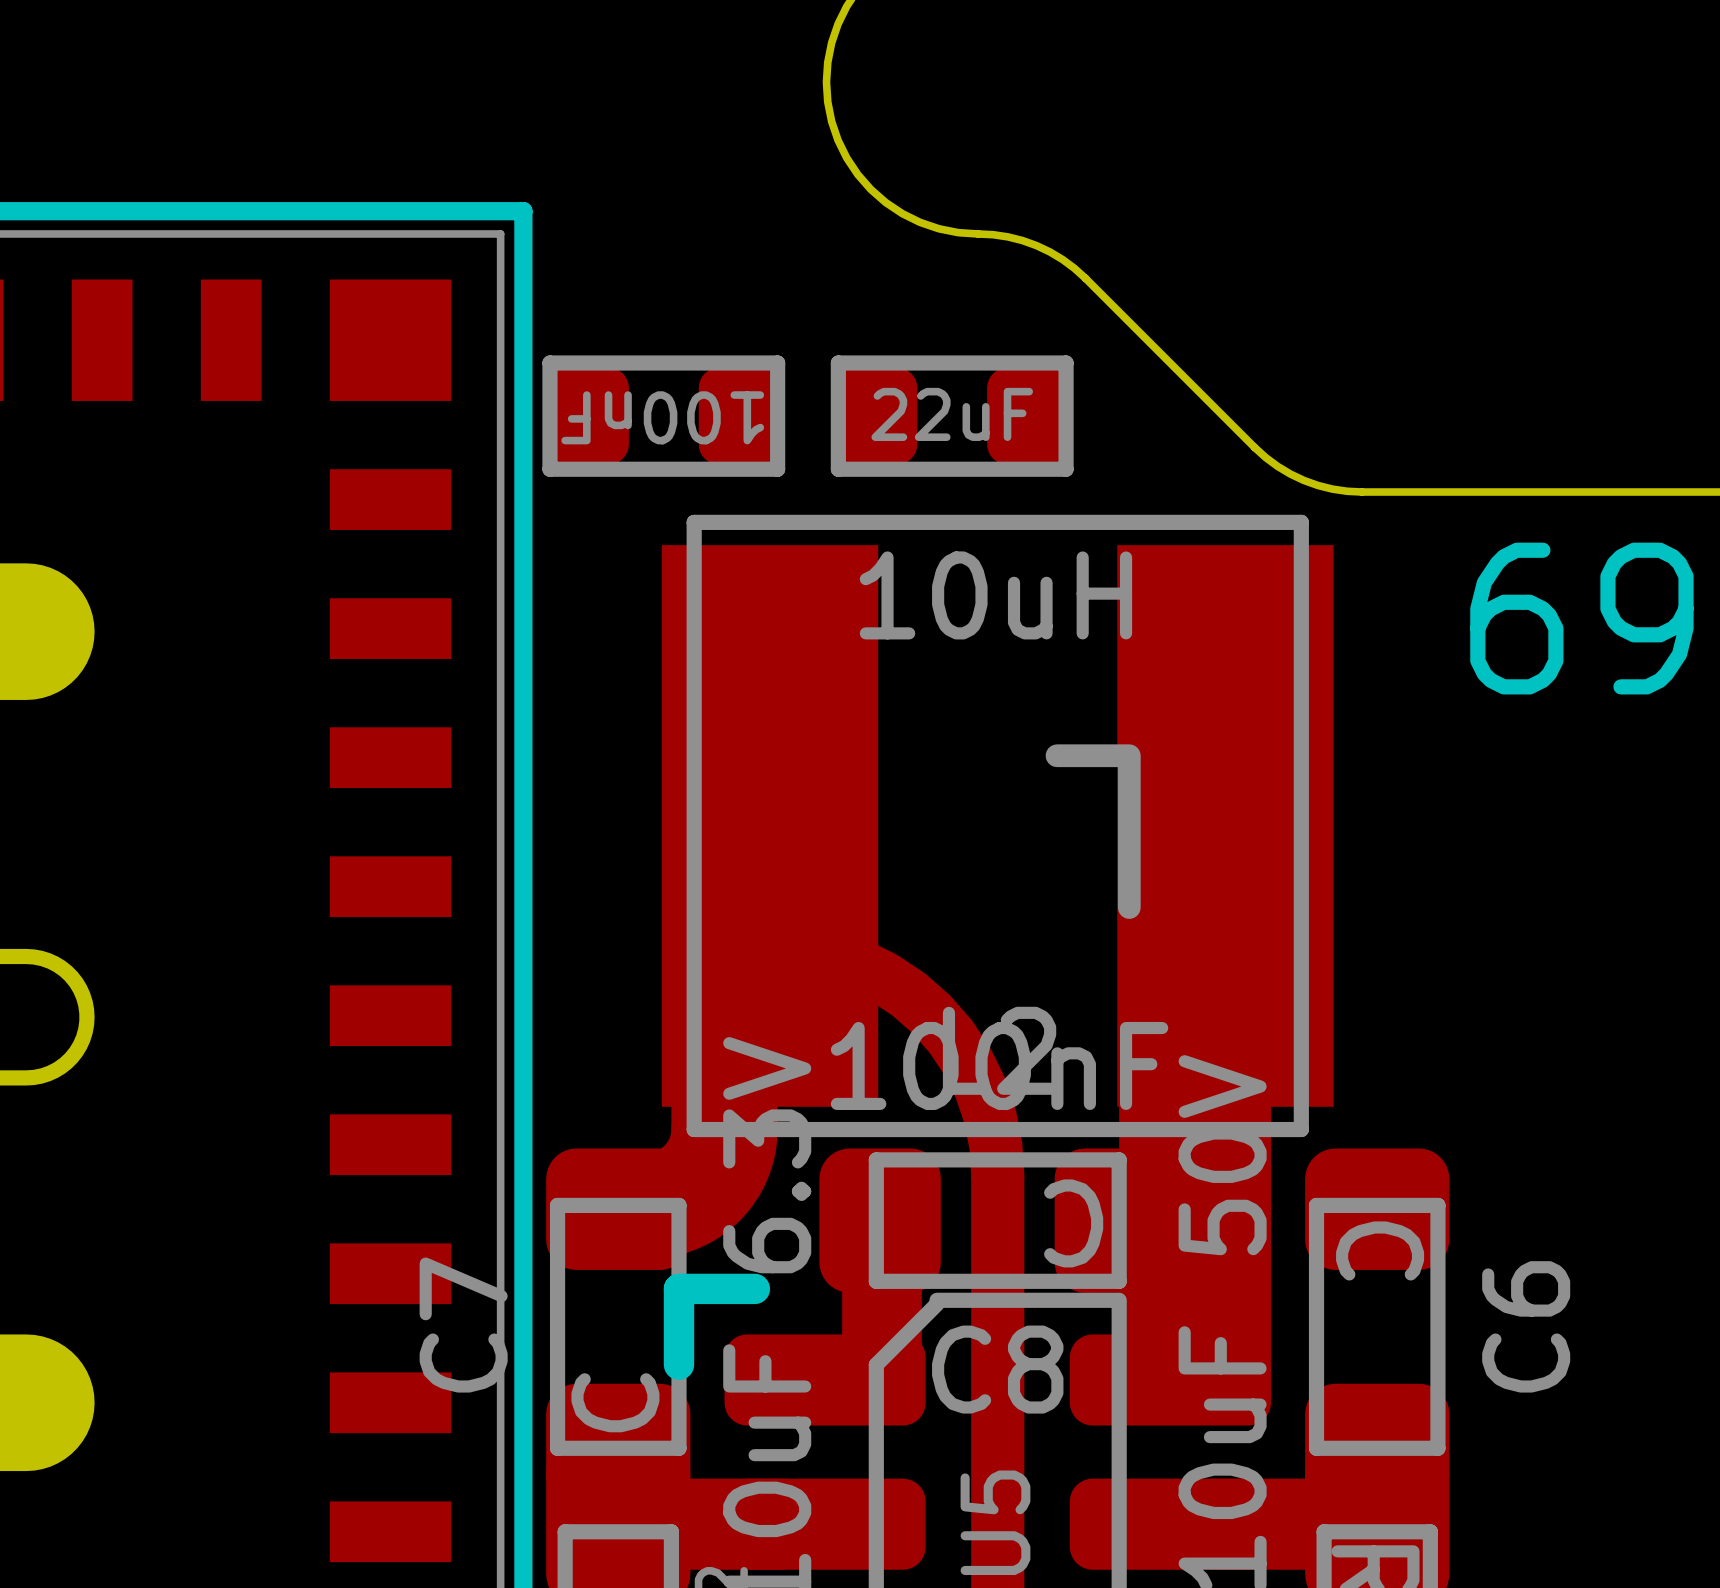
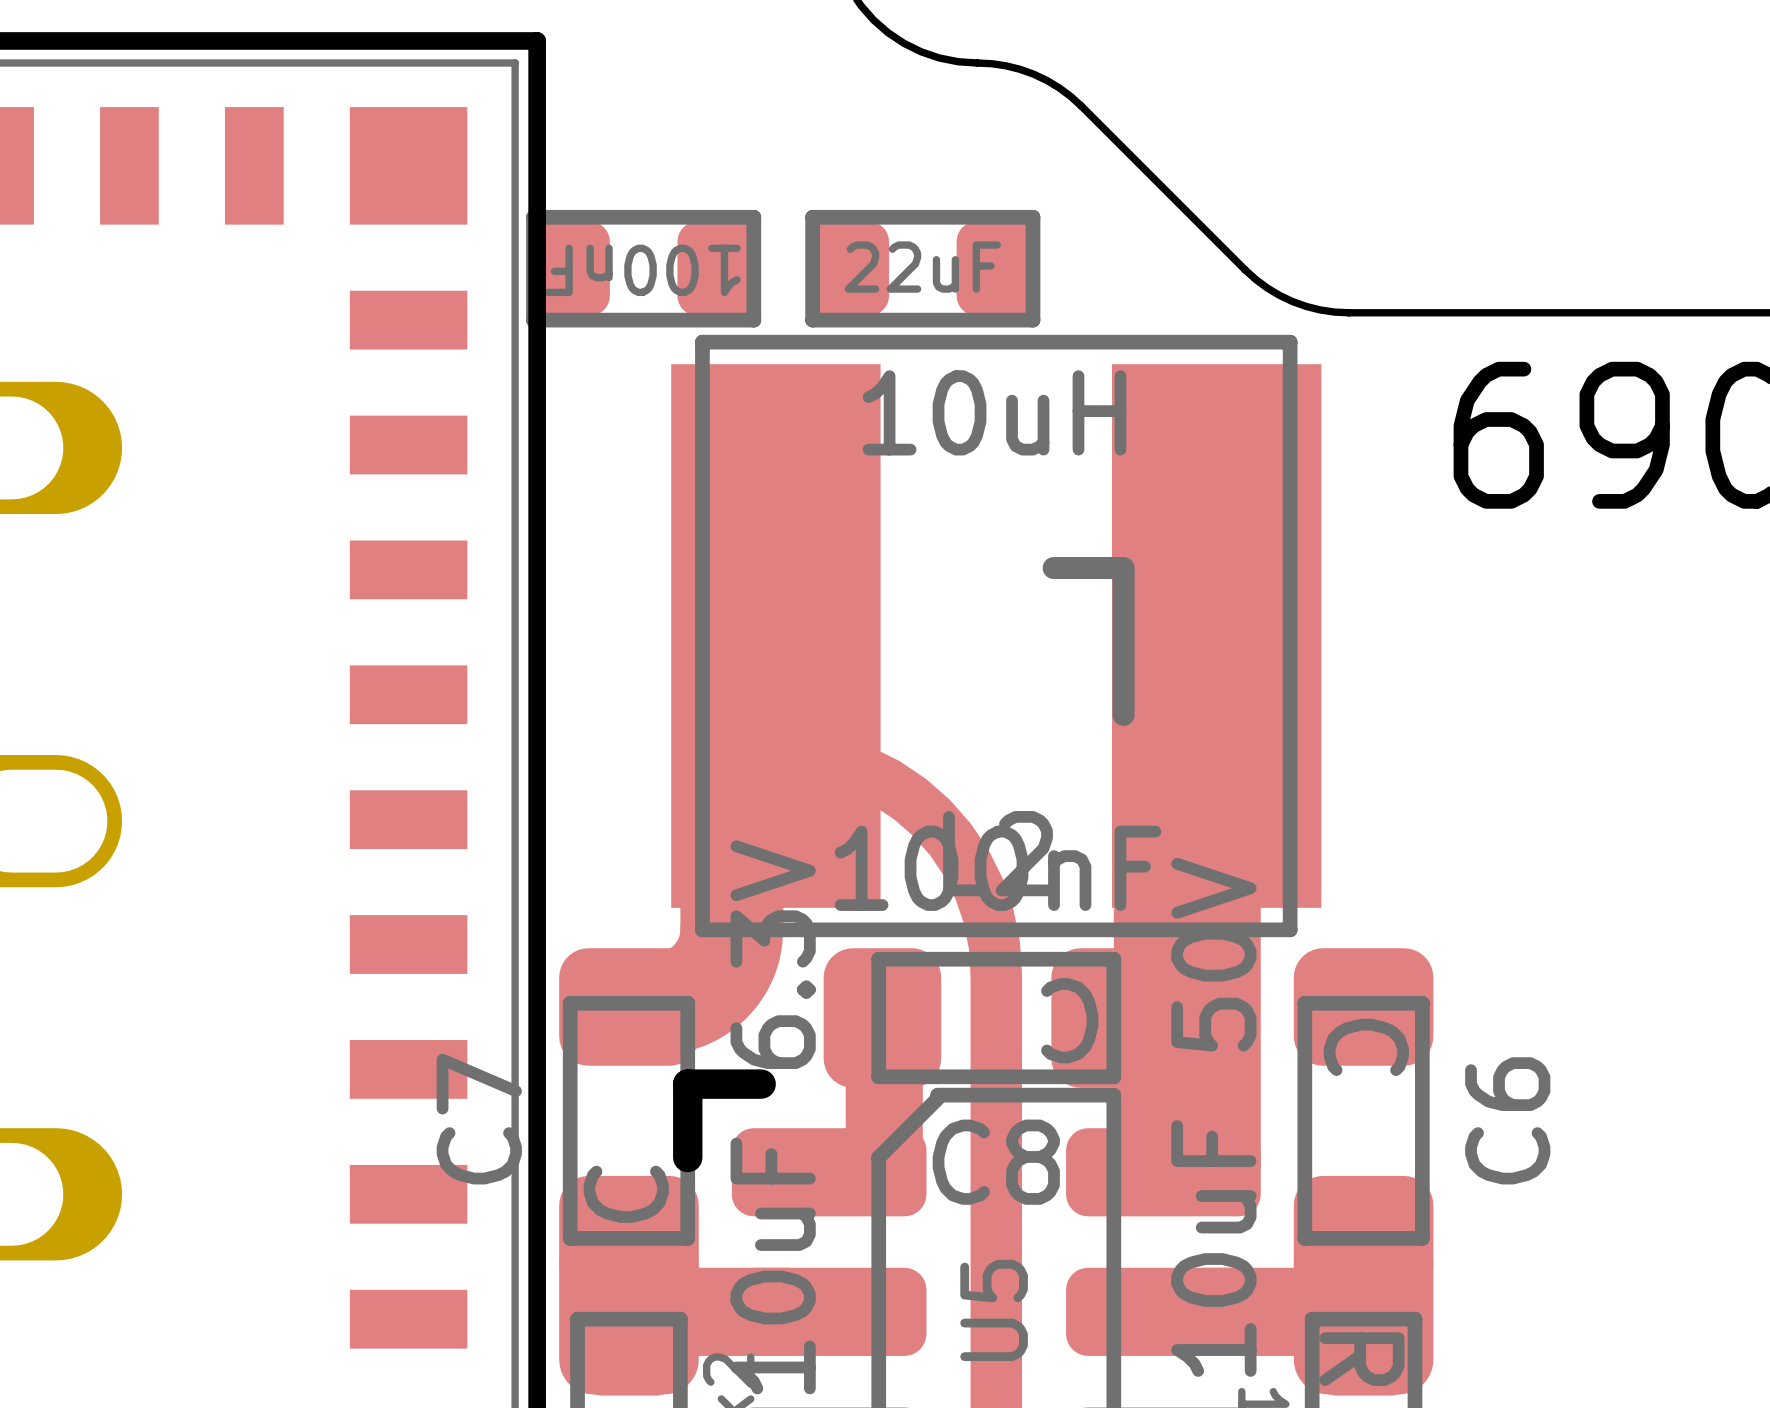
part position: (663, 416) -> (643, 268)
part position: (952, 416) -> (922, 268)

